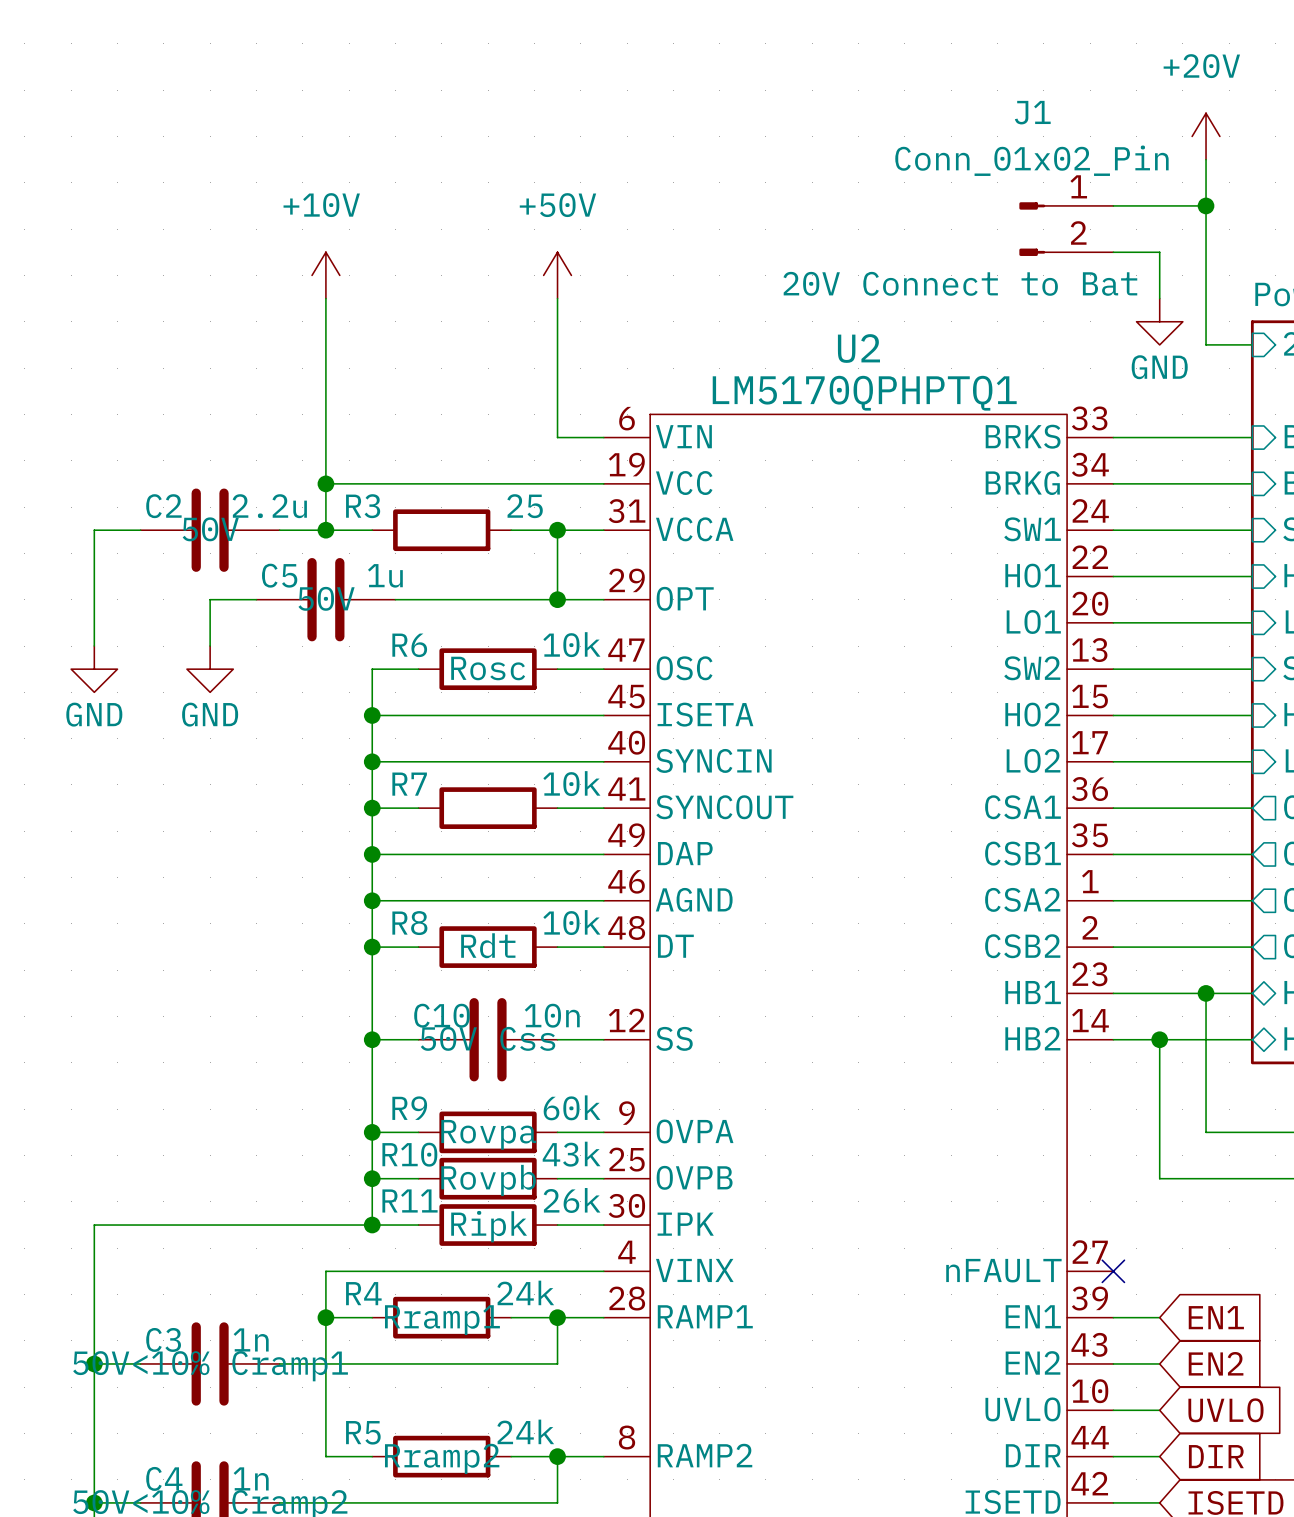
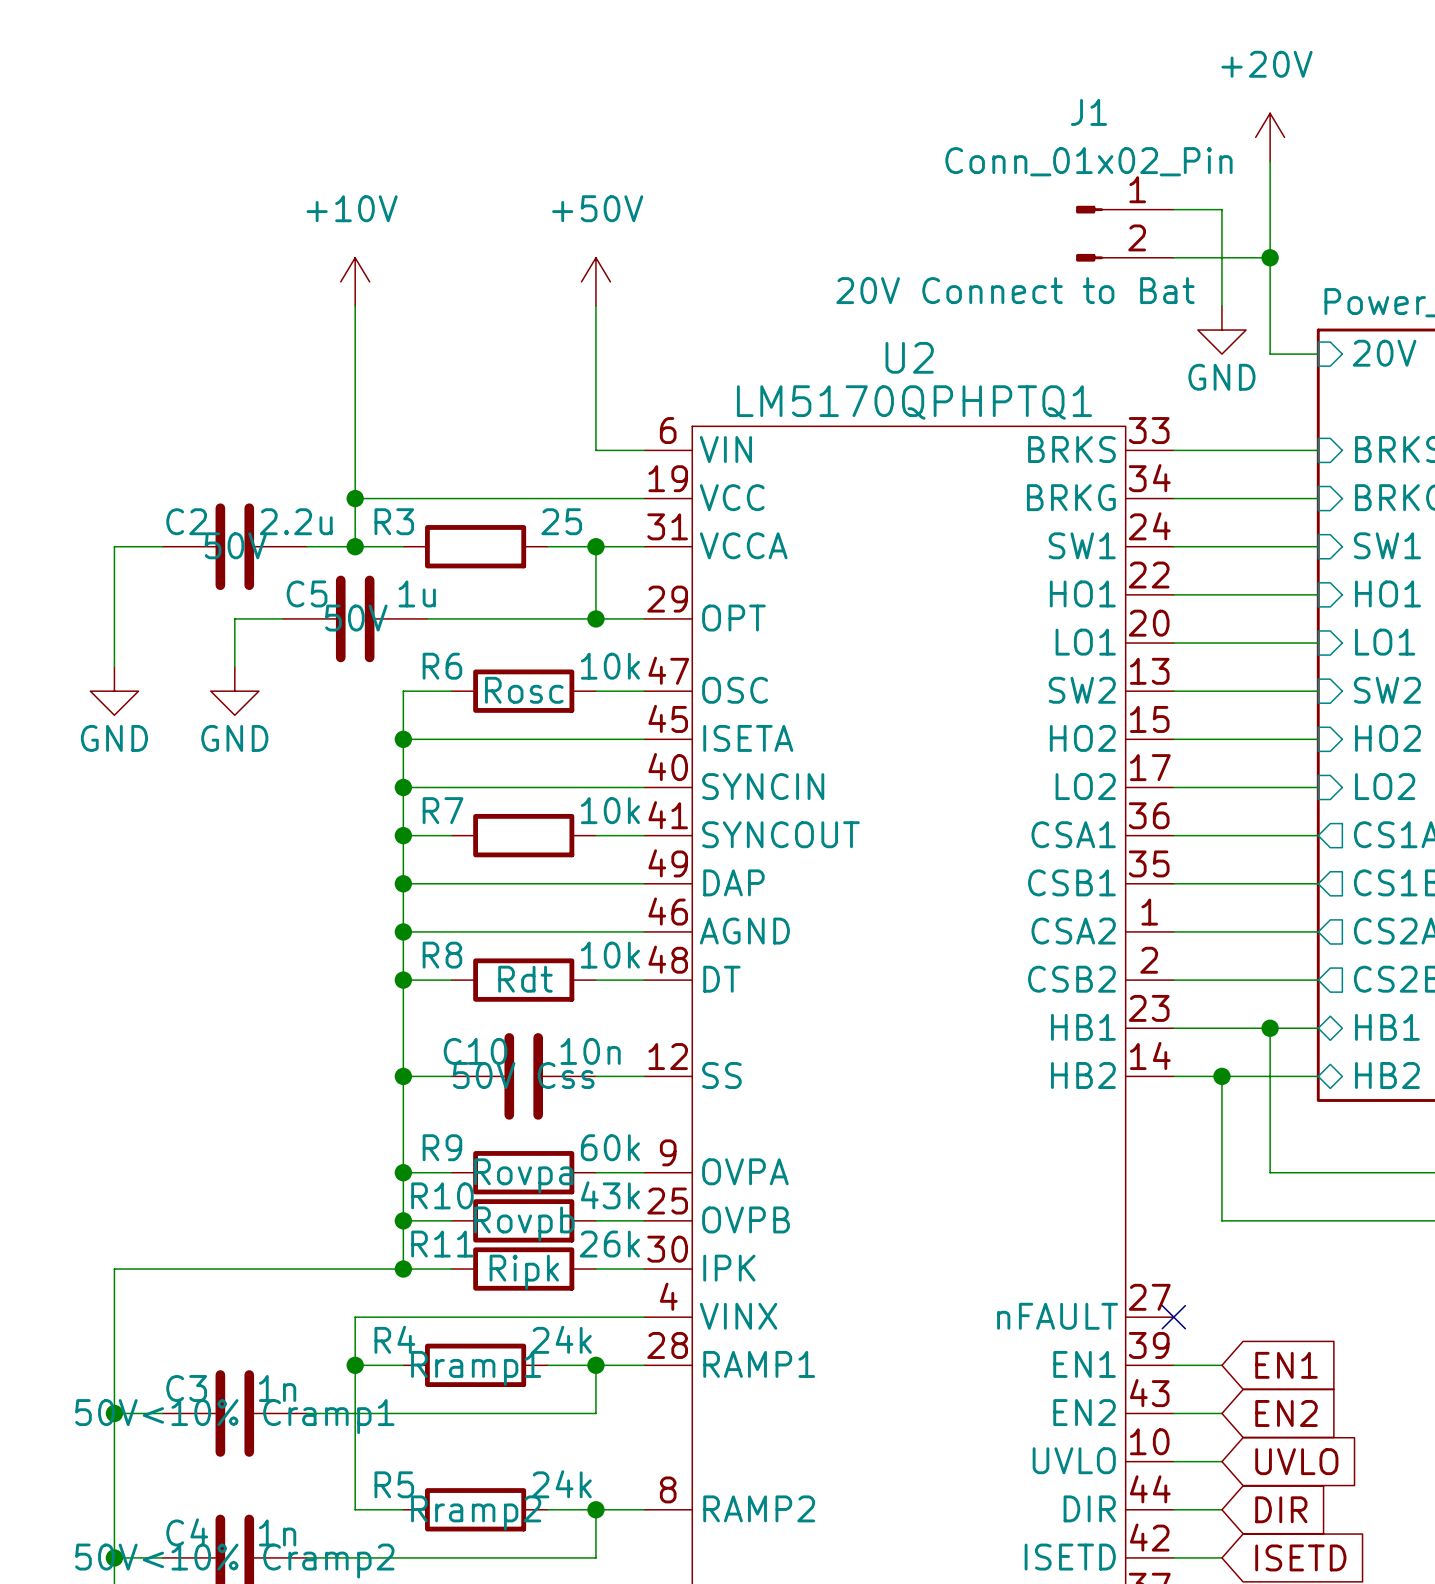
wire: (1159, 205) (1206, 205) -> (1221, 209) (1221, 257) (1270, 257)
junction position: (1206, 205) -> (1270, 257)

